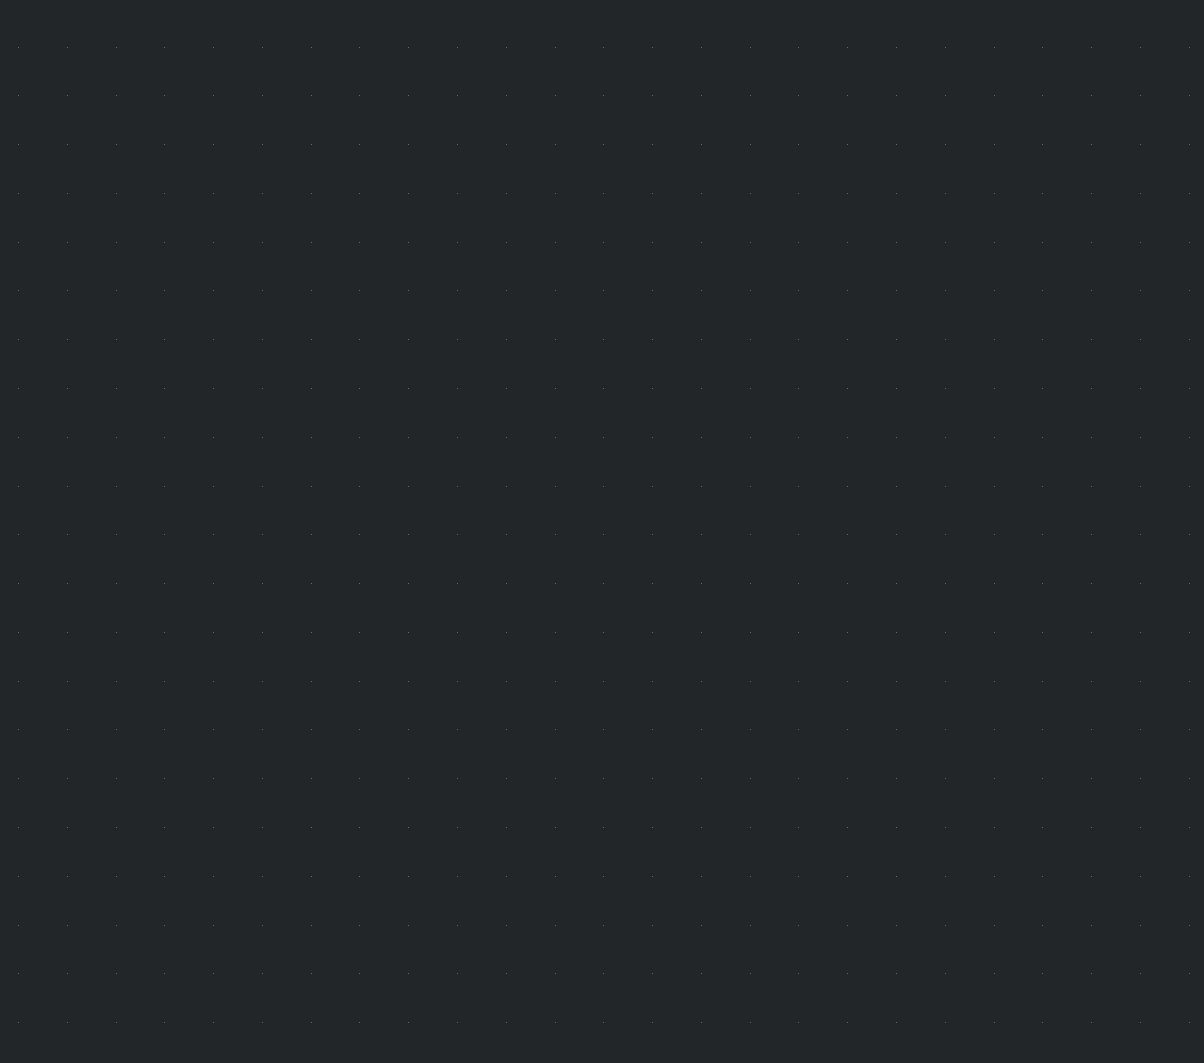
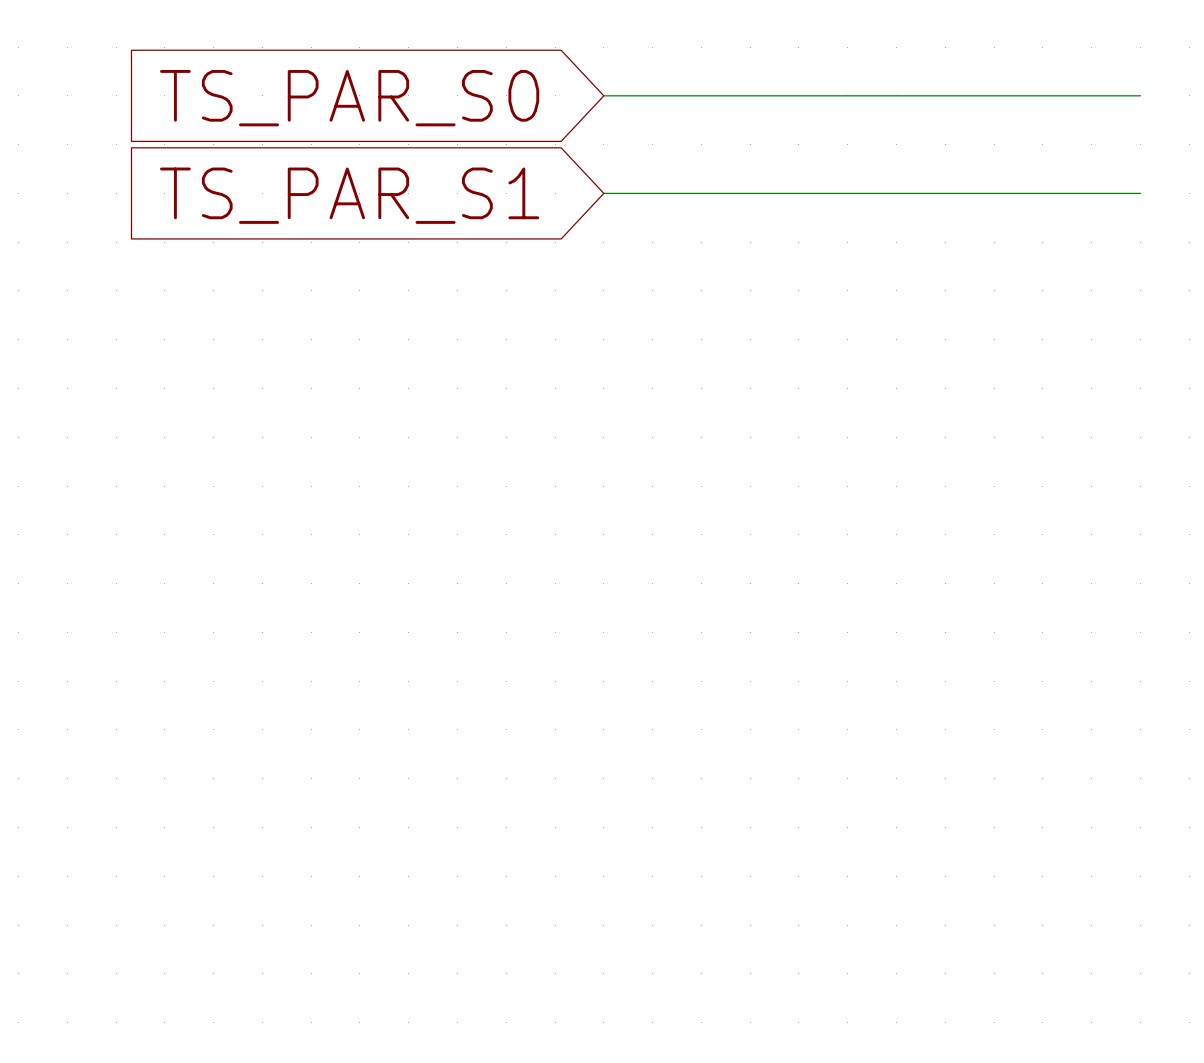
wire: none -> (603, 95) (1140, 95)
global label: none -> TS_PAR_S0 (349, 98)
wire: none -> (603, 193) (1140, 193)
global label: none -> TS_PAR_S1 (349, 195)

